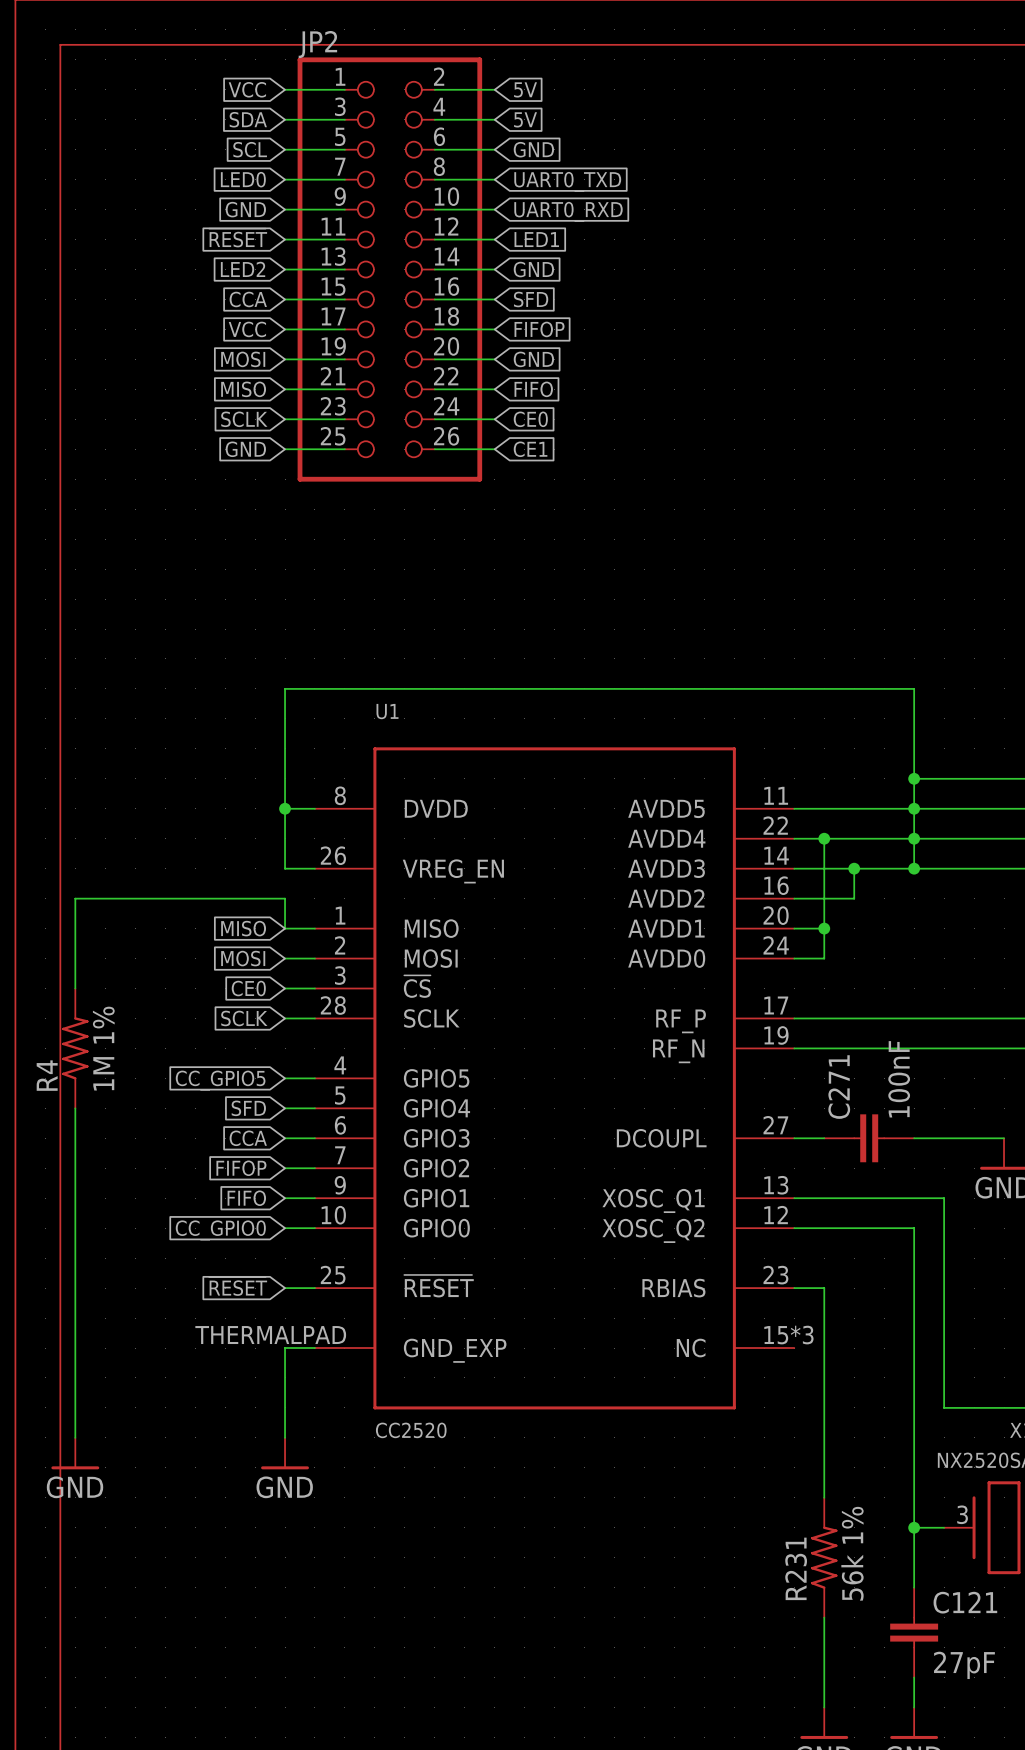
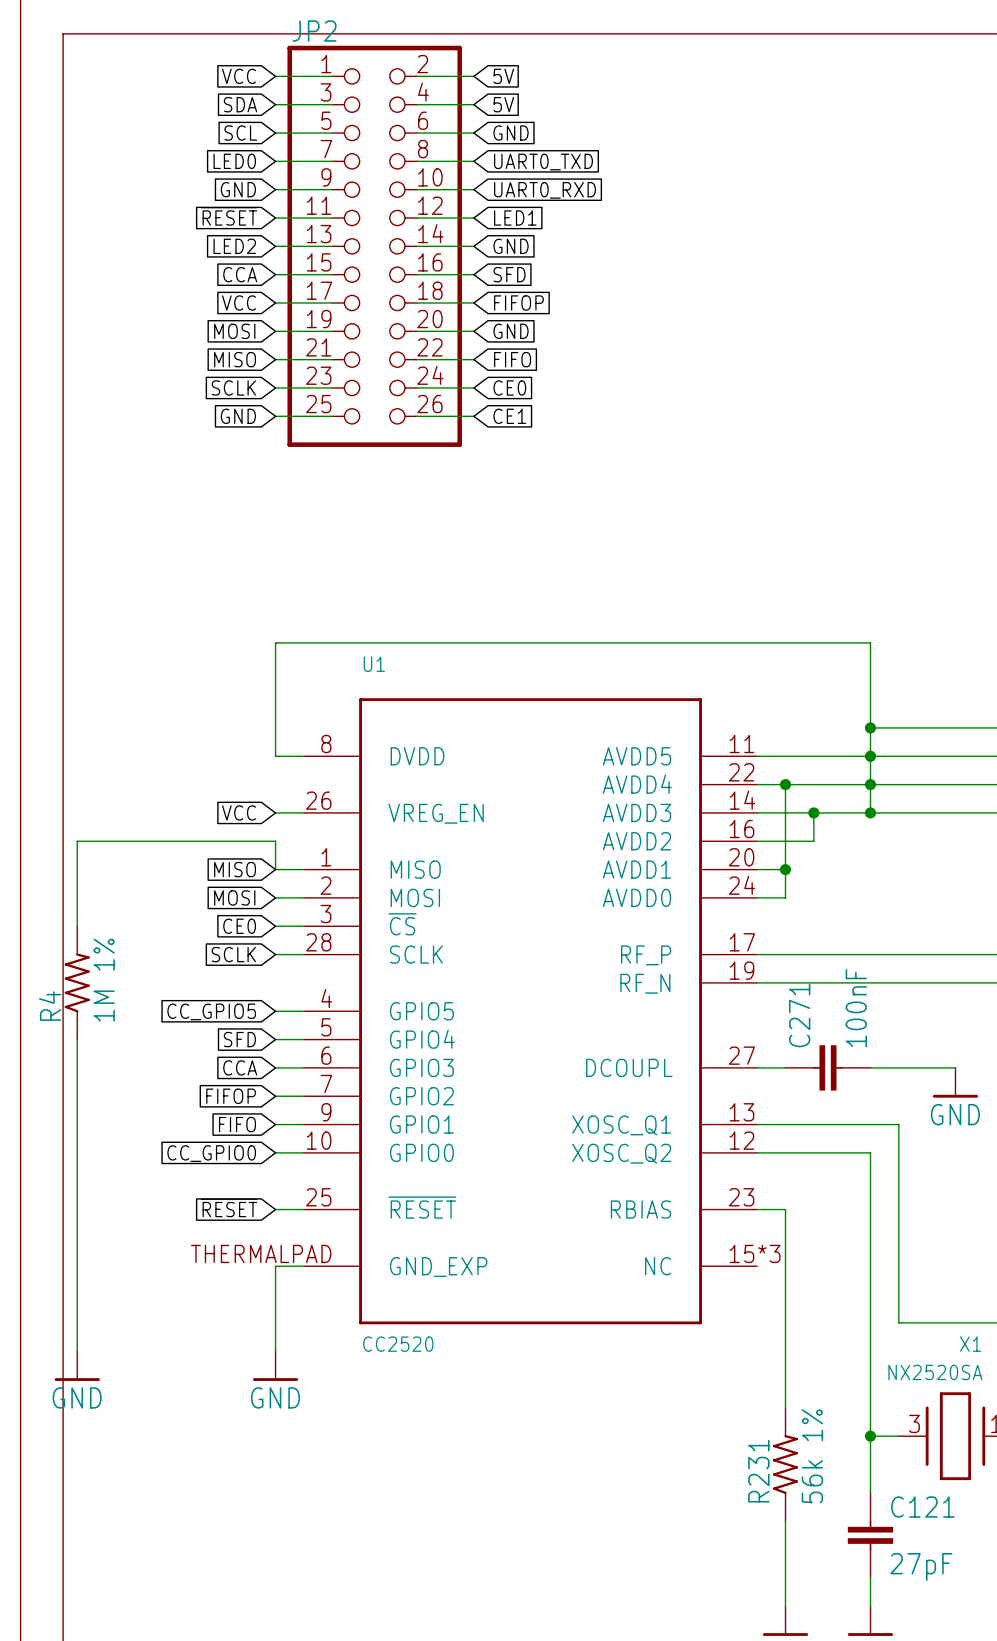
wire: (285, 808) (285, 868) -> none
junction: (285, 808) -> none
global label: none -> VCC (239, 812)

